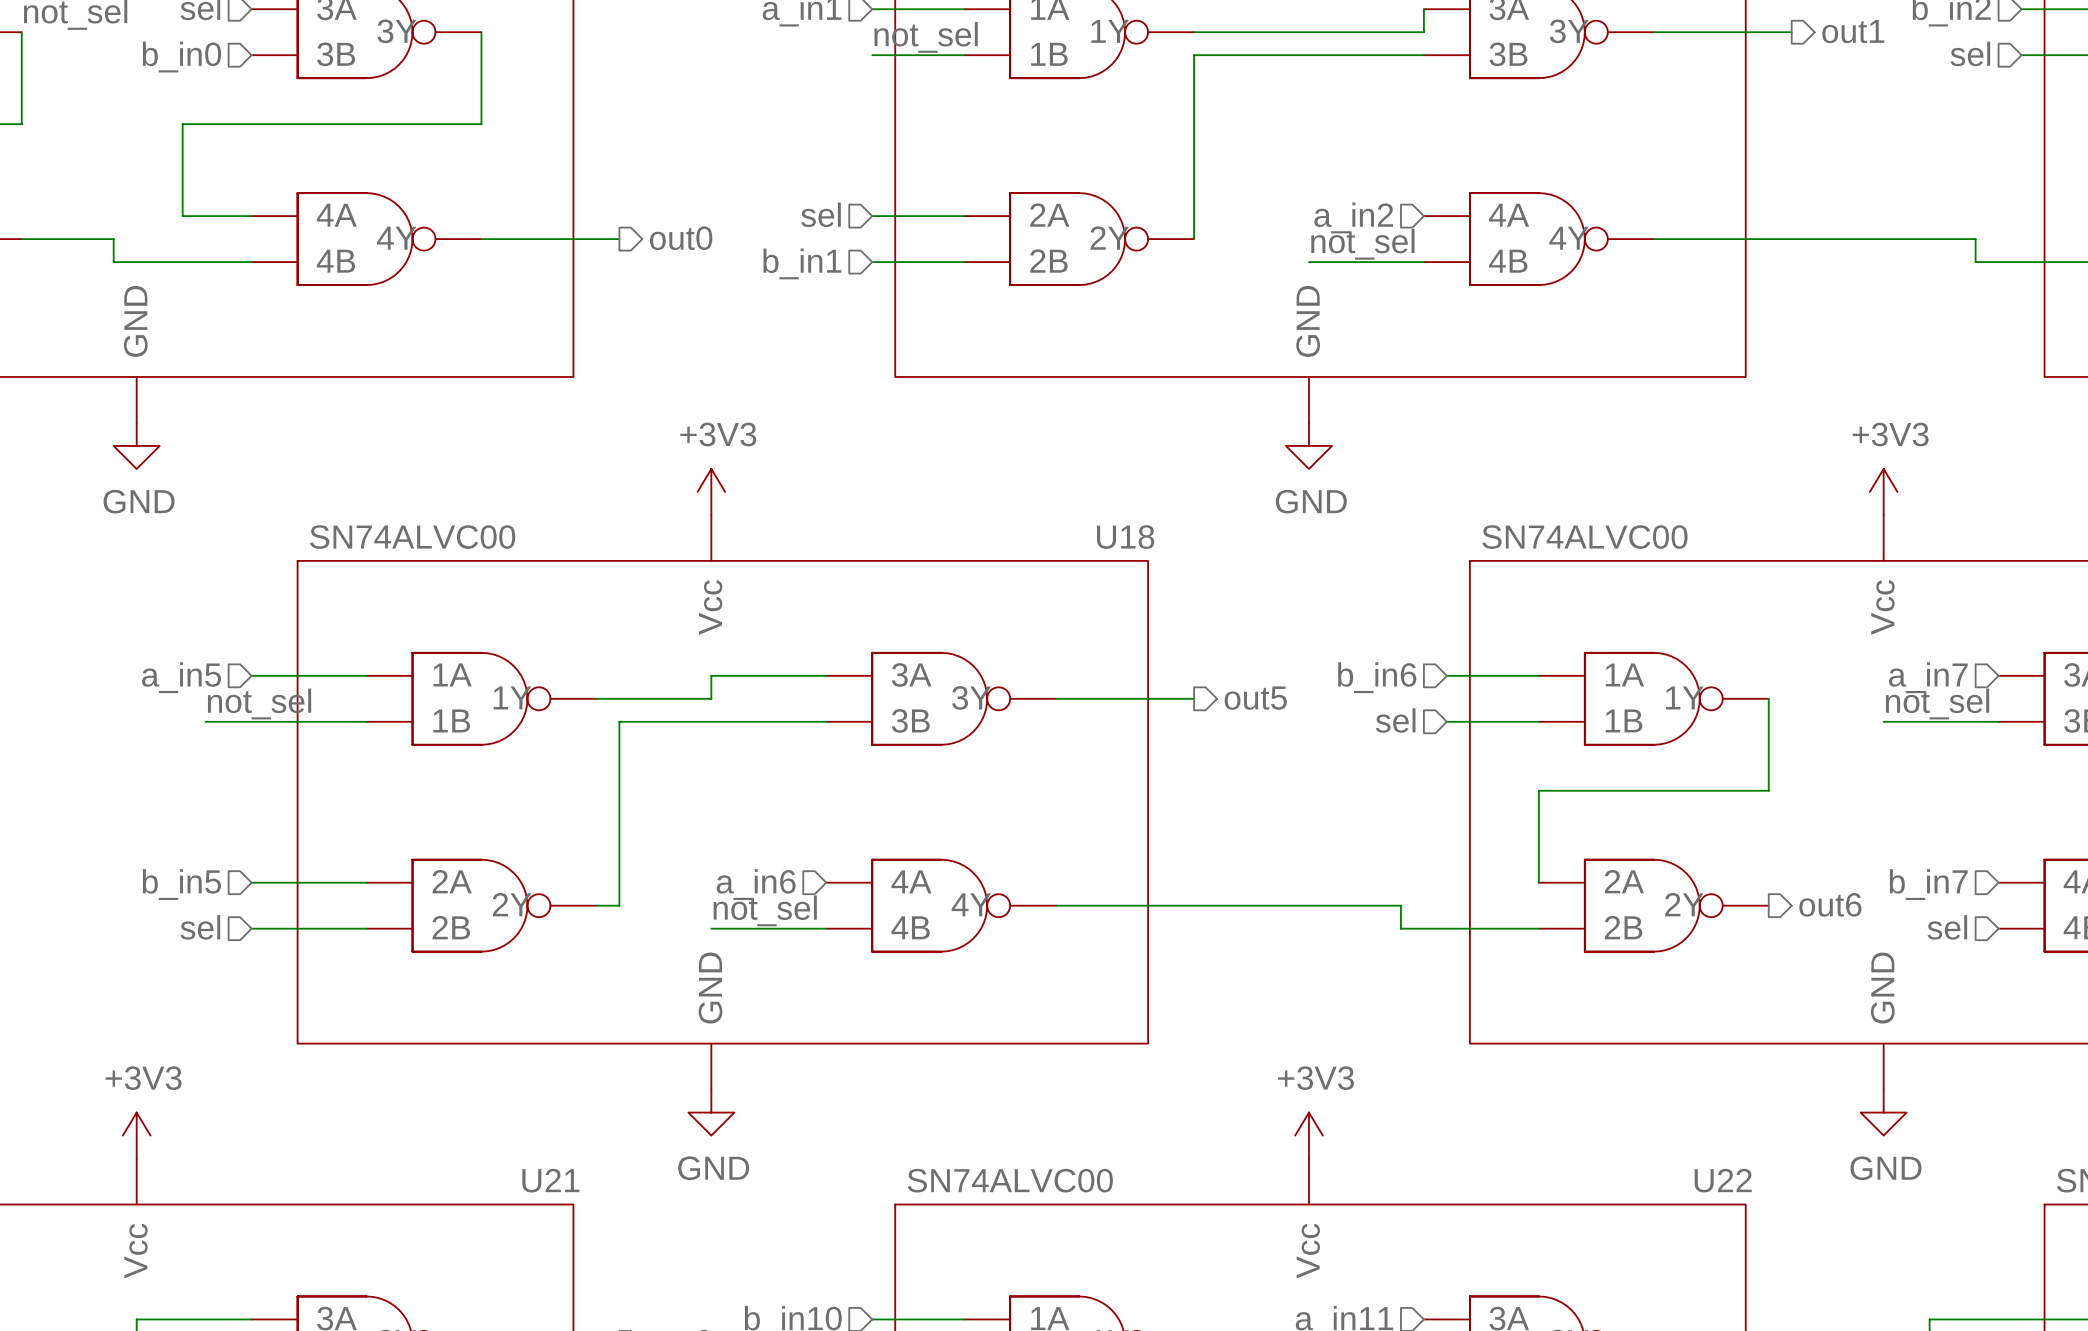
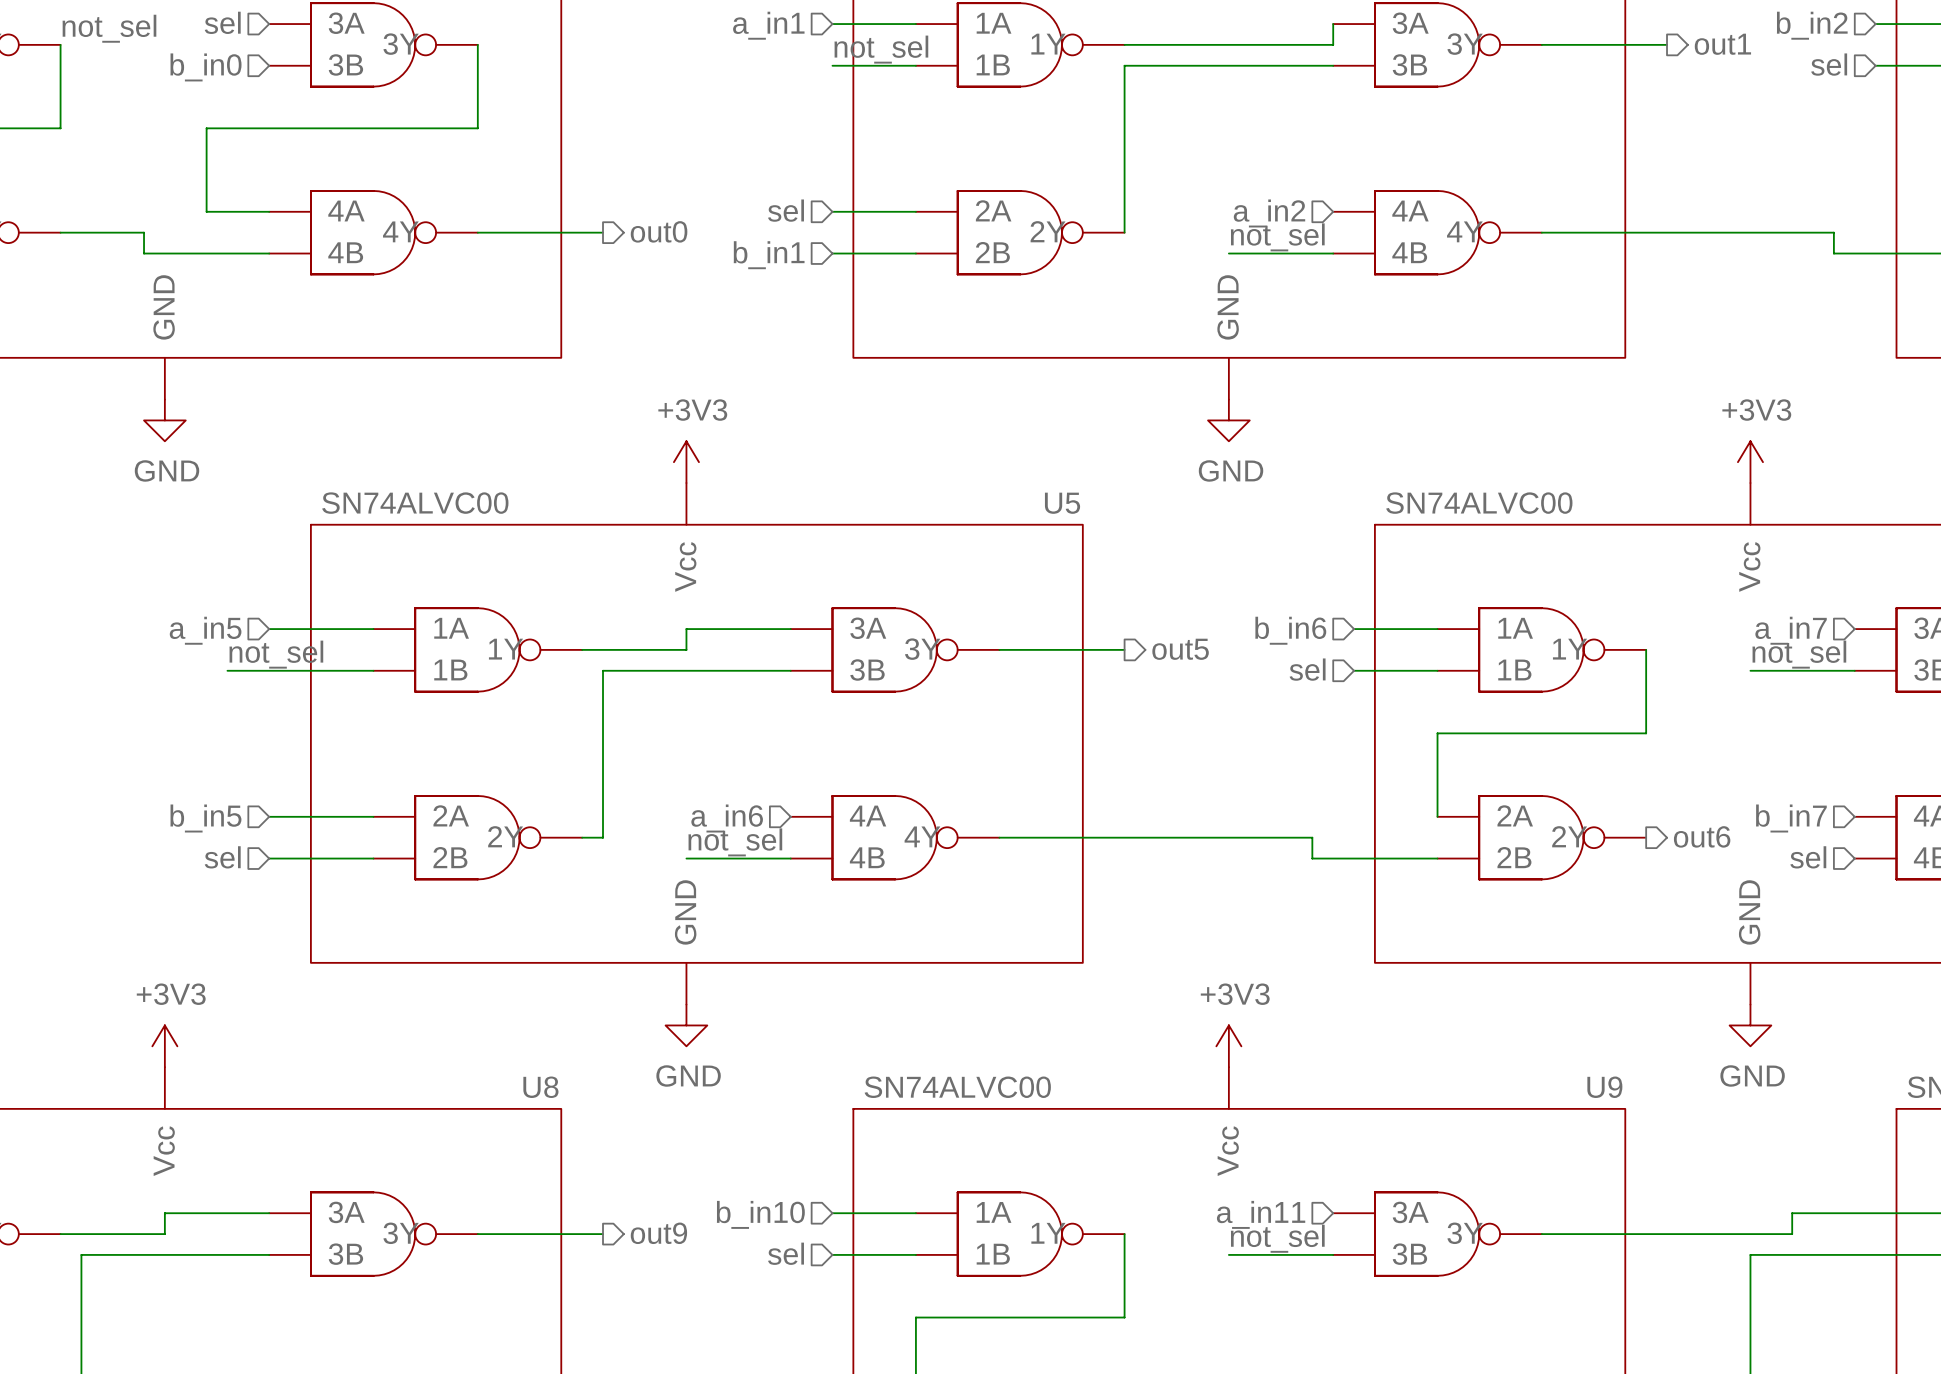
U18 name: U18 (1125, 537) -> U5 (1062, 503)
U21 name: U21 (550, 1180) -> U8 (540, 1087)
U22 name: U22 (1723, 1180) -> U9 (1604, 1087)

